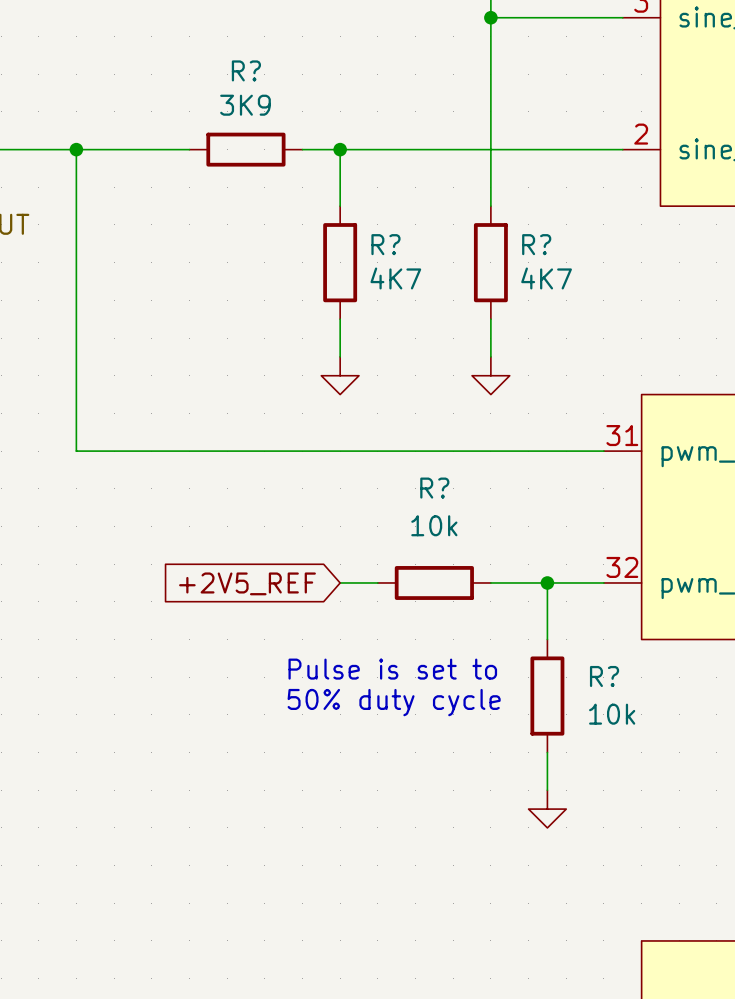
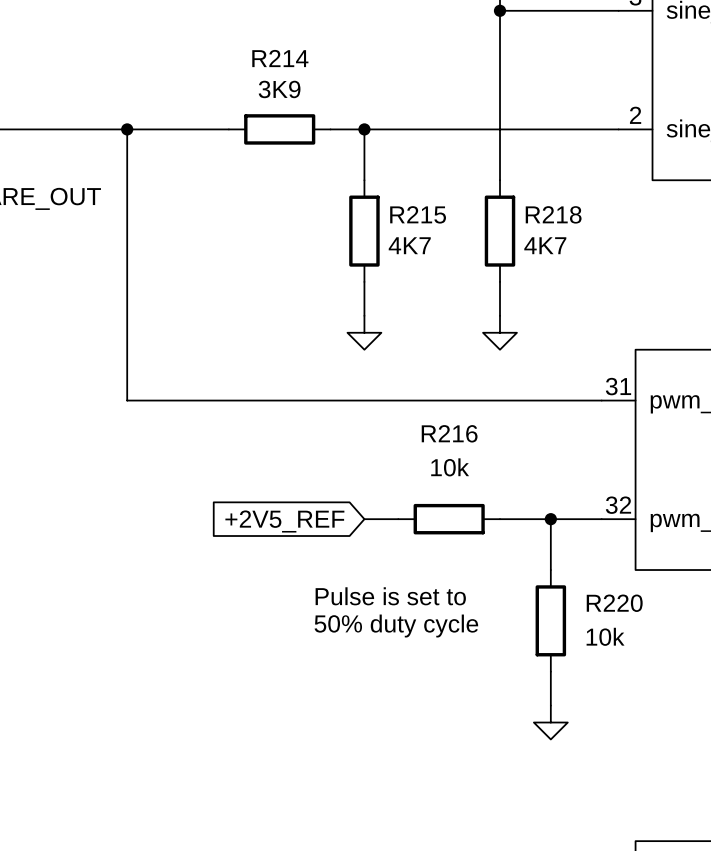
R? name: R? (246, 70) -> R214 (280, 58)
R? name: R? (385, 244) -> R215 (418, 214)
R? name: R? (536, 244) -> R218 (553, 214)
R? name: R? (434, 488) -> R216 (449, 433)
R? name: R? (604, 676) -> R220 (614, 603)

